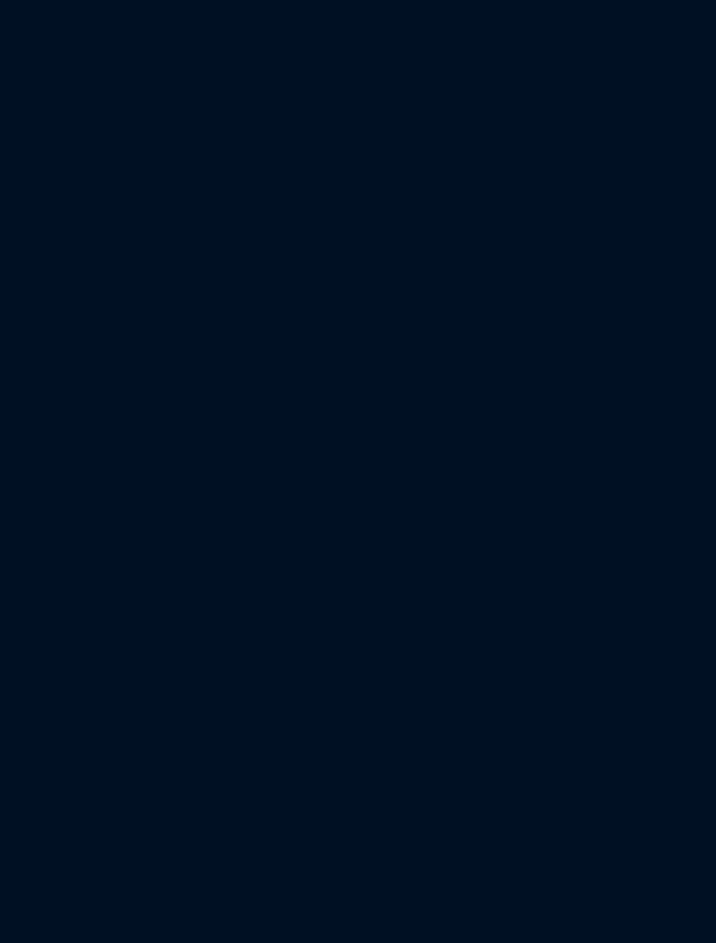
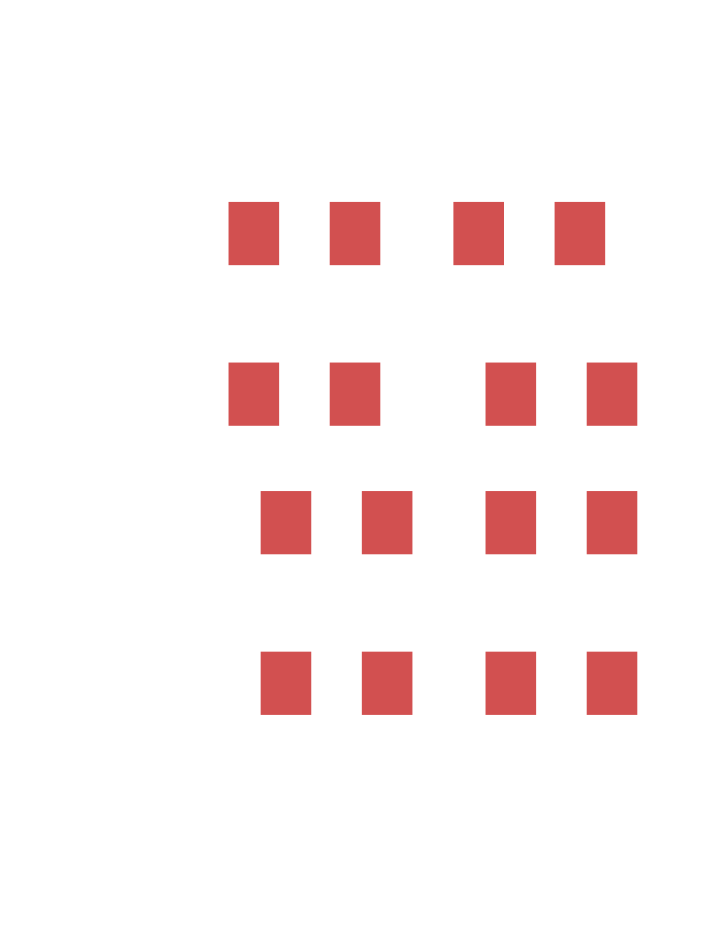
part: none -> (304, 233)
part: none -> (529, 233)
part: none -> (304, 394)
part: none -> (561, 394)
part: none -> (336, 522)
part: none -> (561, 522)
part: none -> (336, 683)
part: none -> (561, 683)

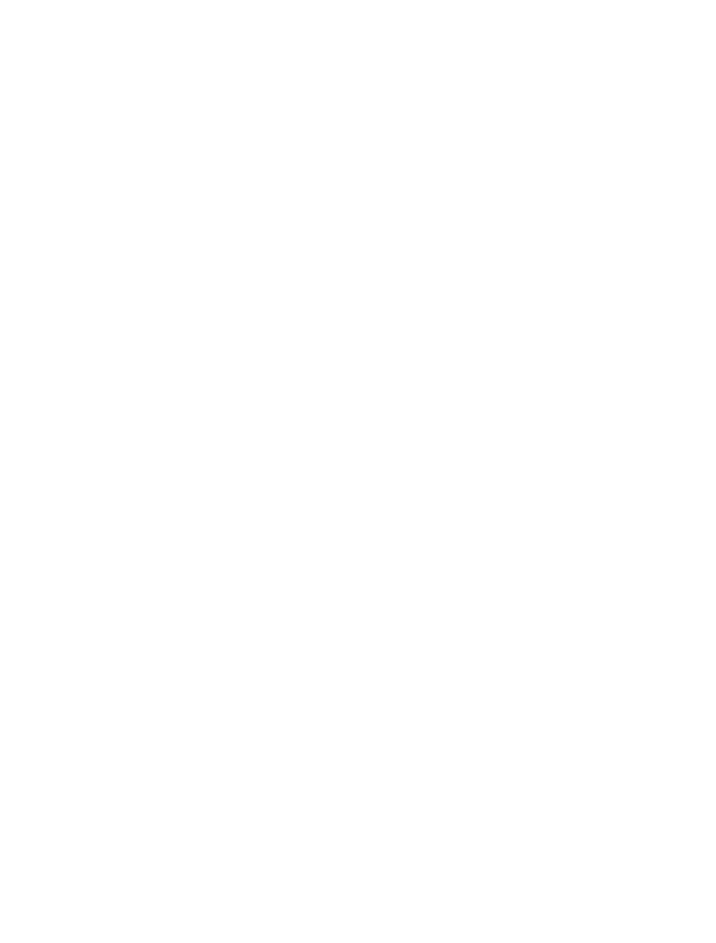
part: (304, 233) -> none
part: (529, 233) -> none
part: (304, 394) -> none
part: (561, 394) -> none
part: (336, 522) -> none
part: (561, 522) -> none
part: (336, 683) -> none
part: (561, 683) -> none

